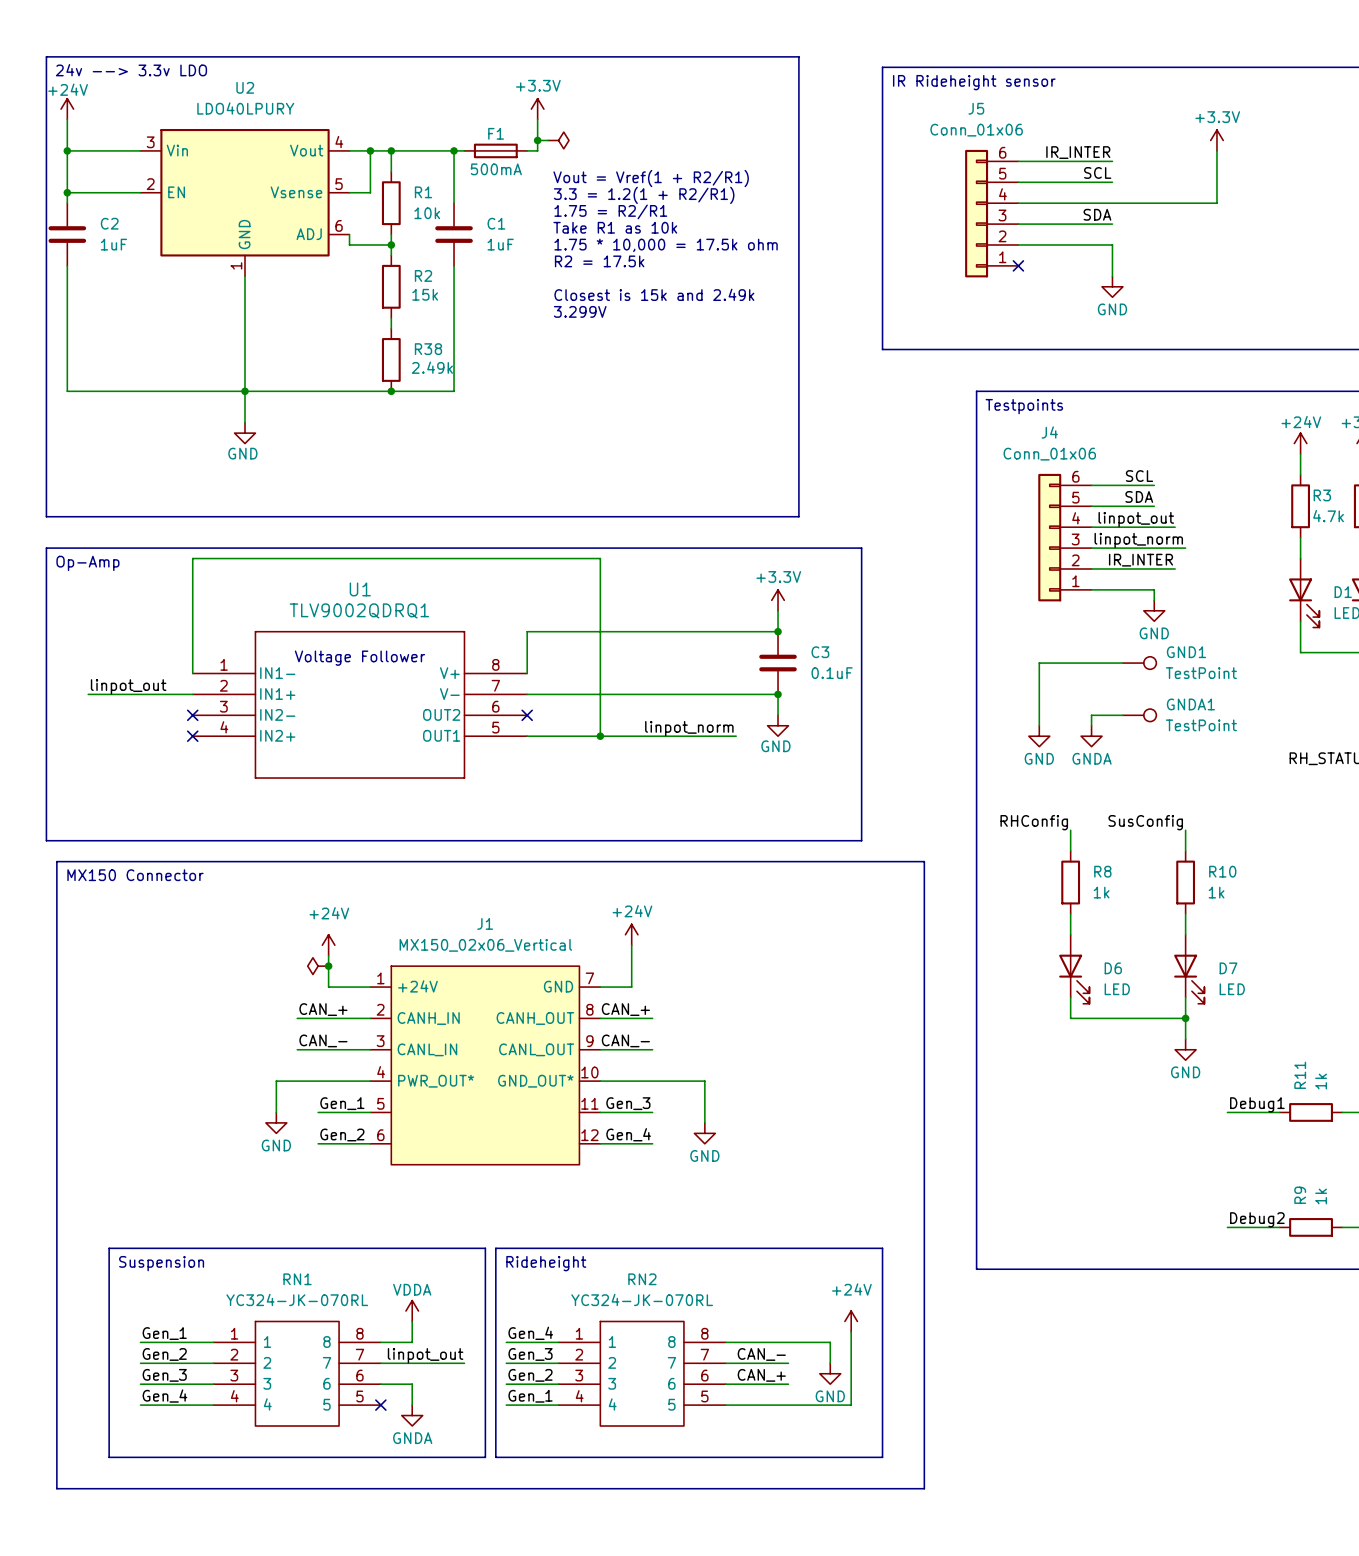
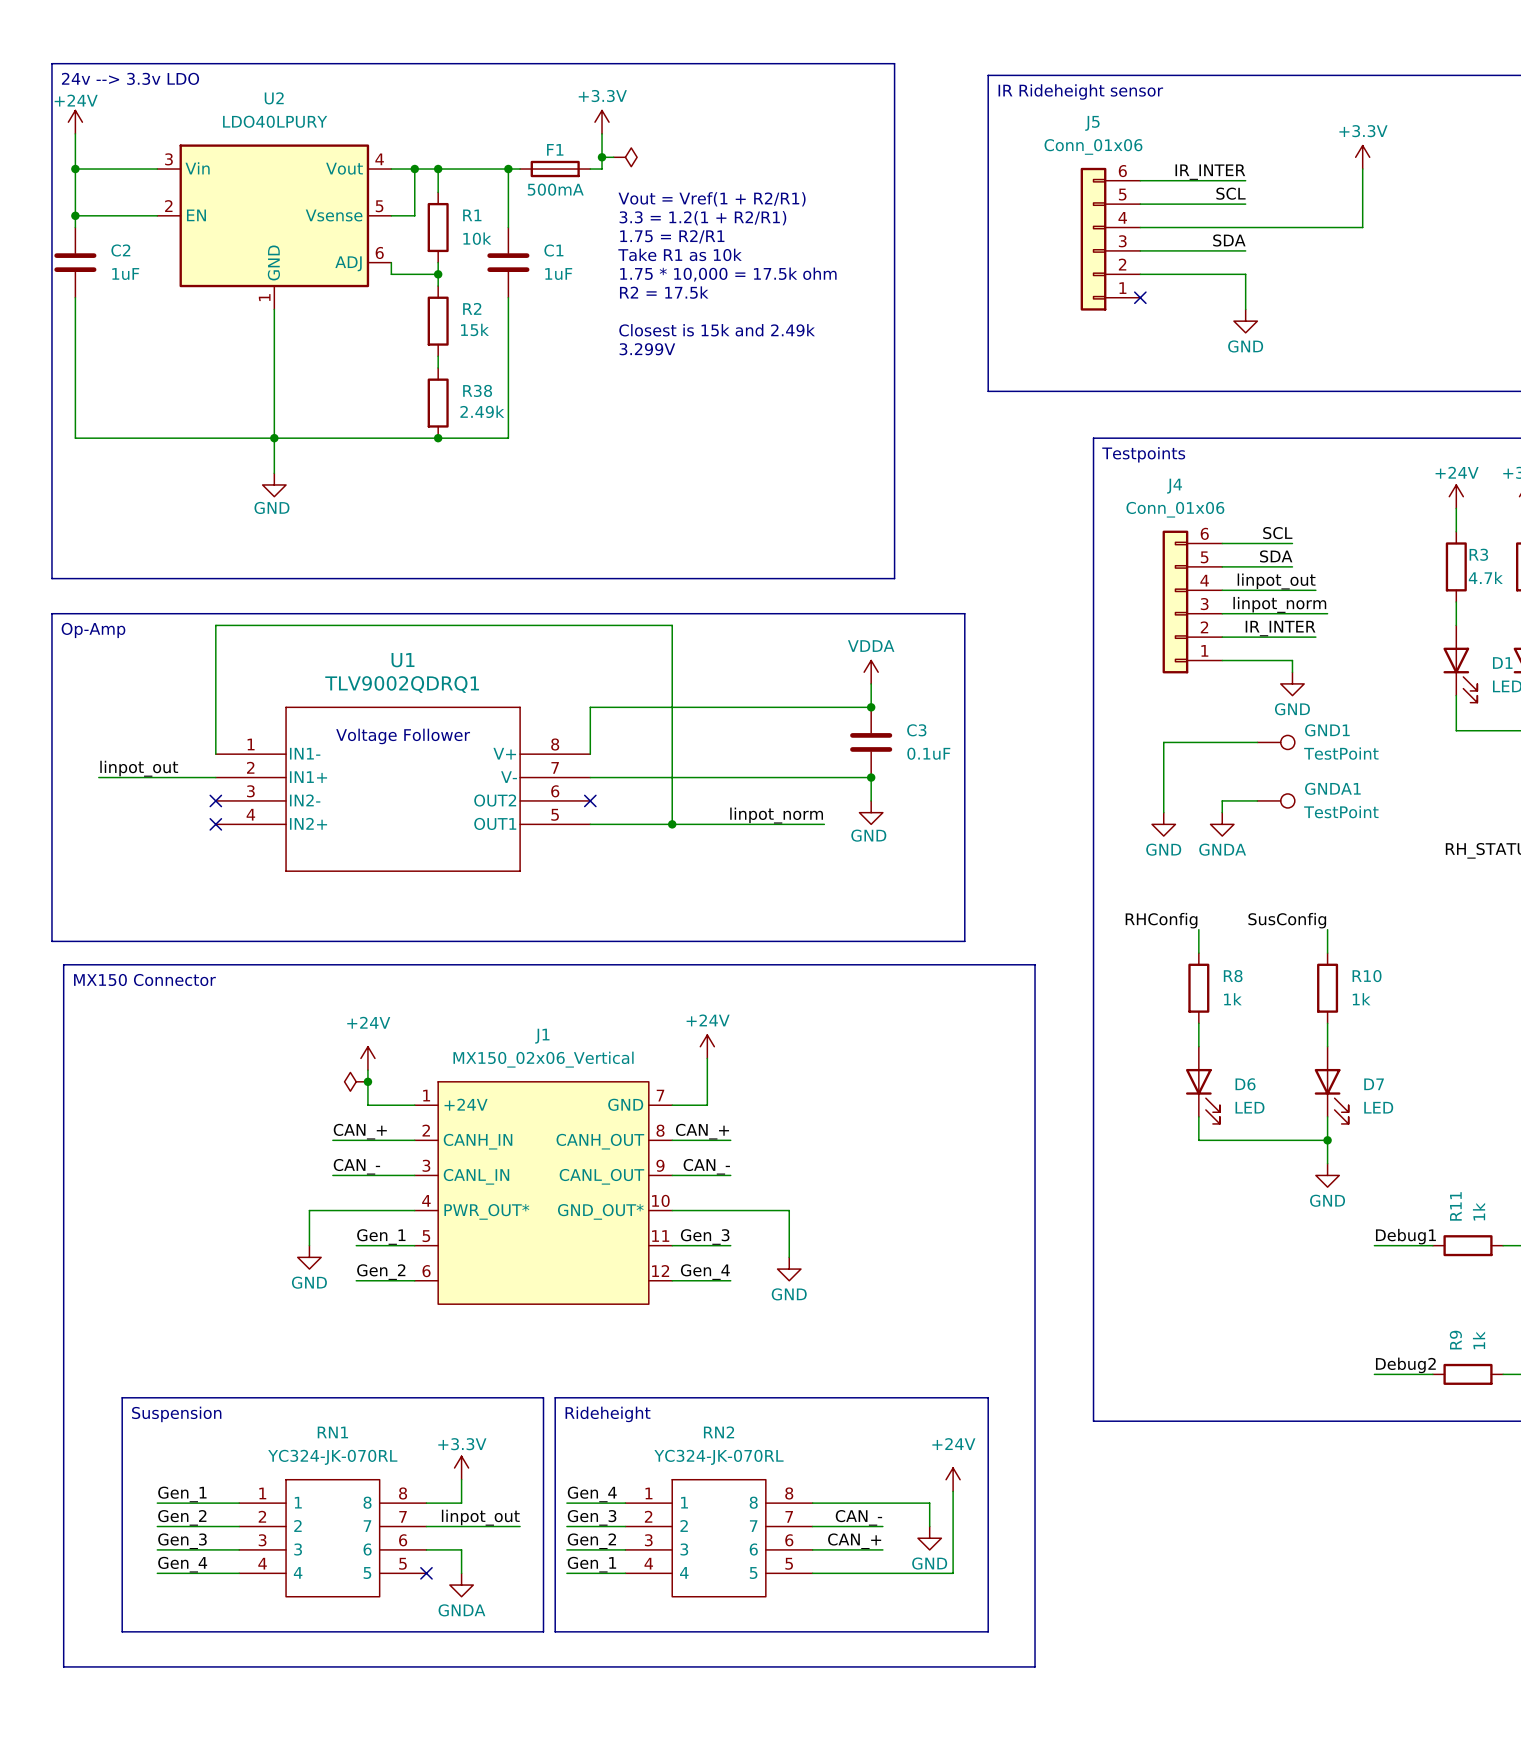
power symbol: +3.3V (778, 600) -> VDDA (871, 672)
power symbol: VDDA (412, 1311) -> +3.3V (461, 1468)

